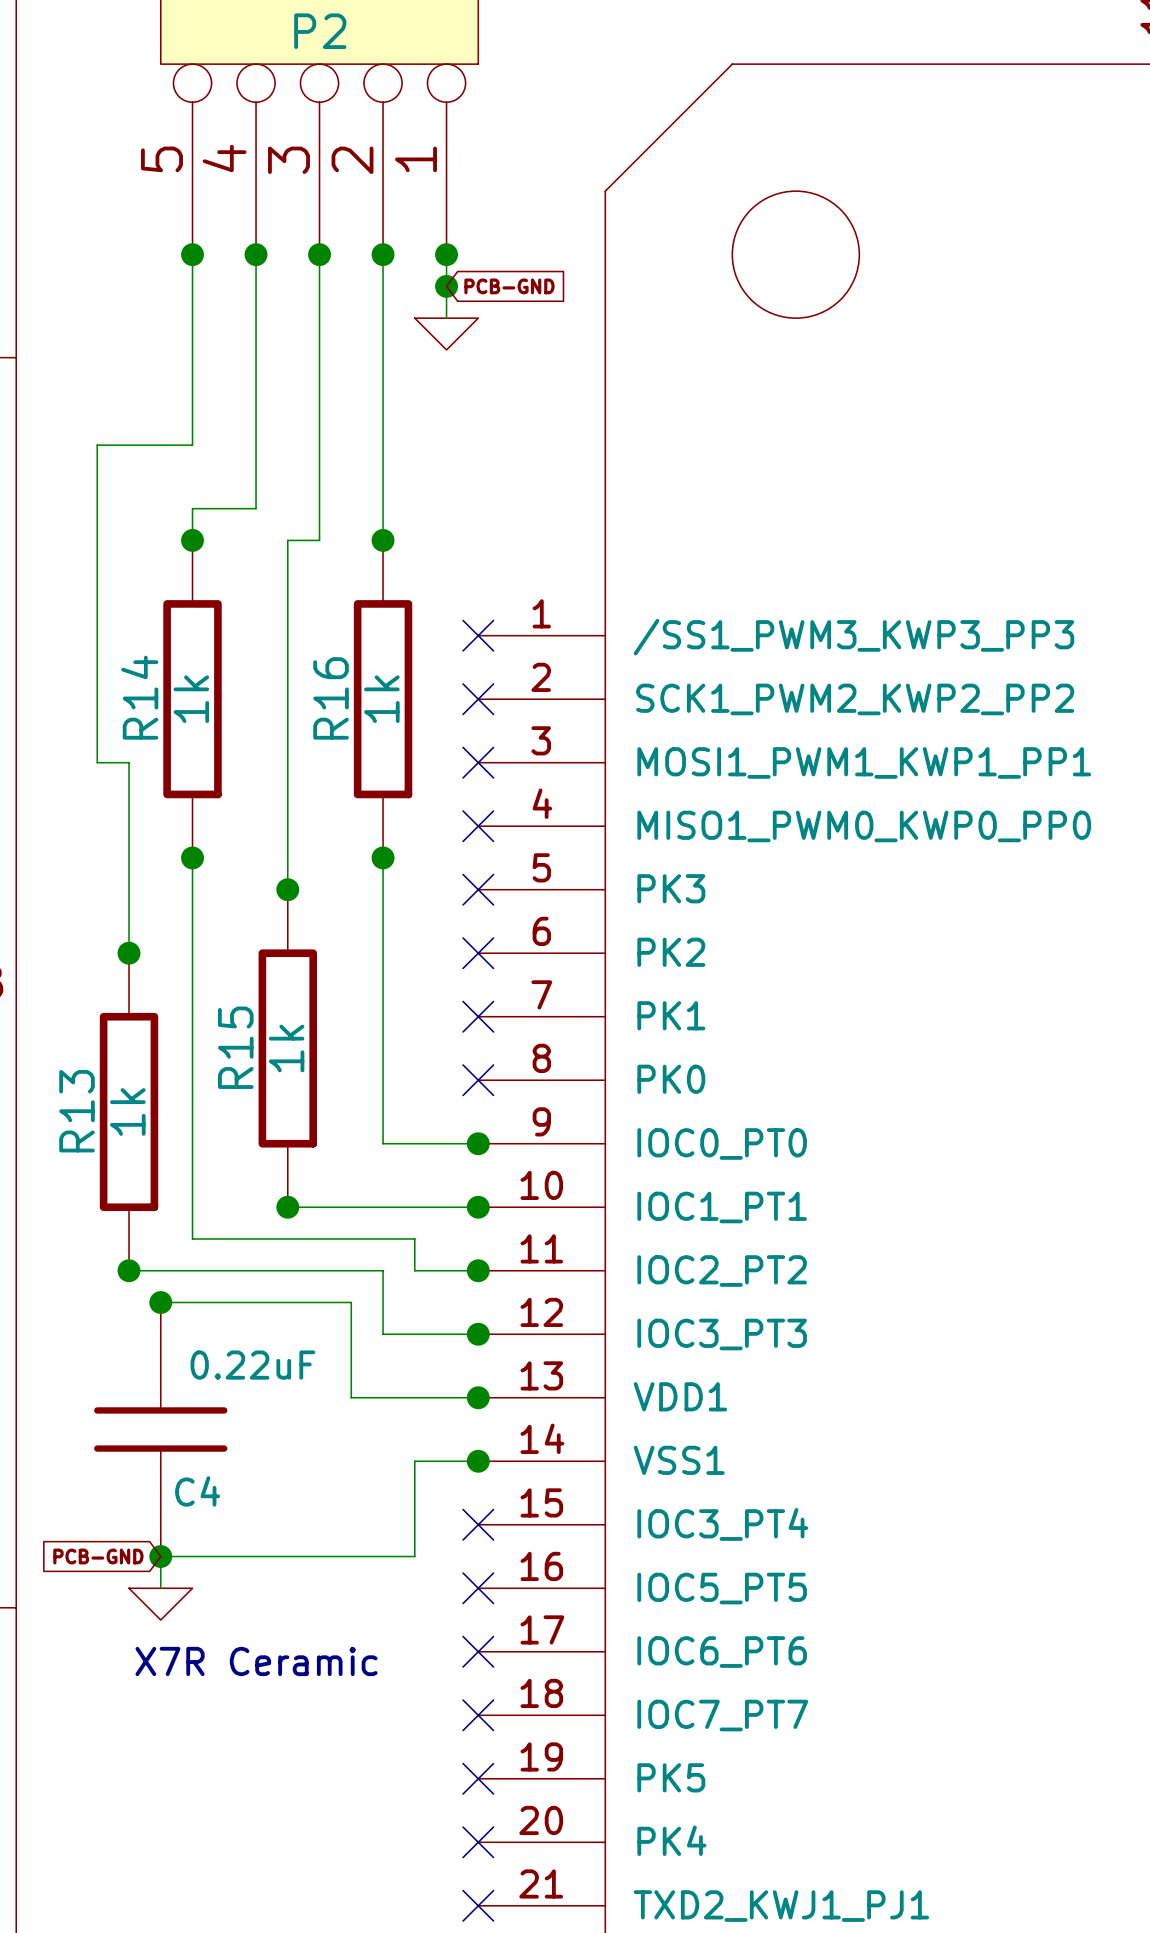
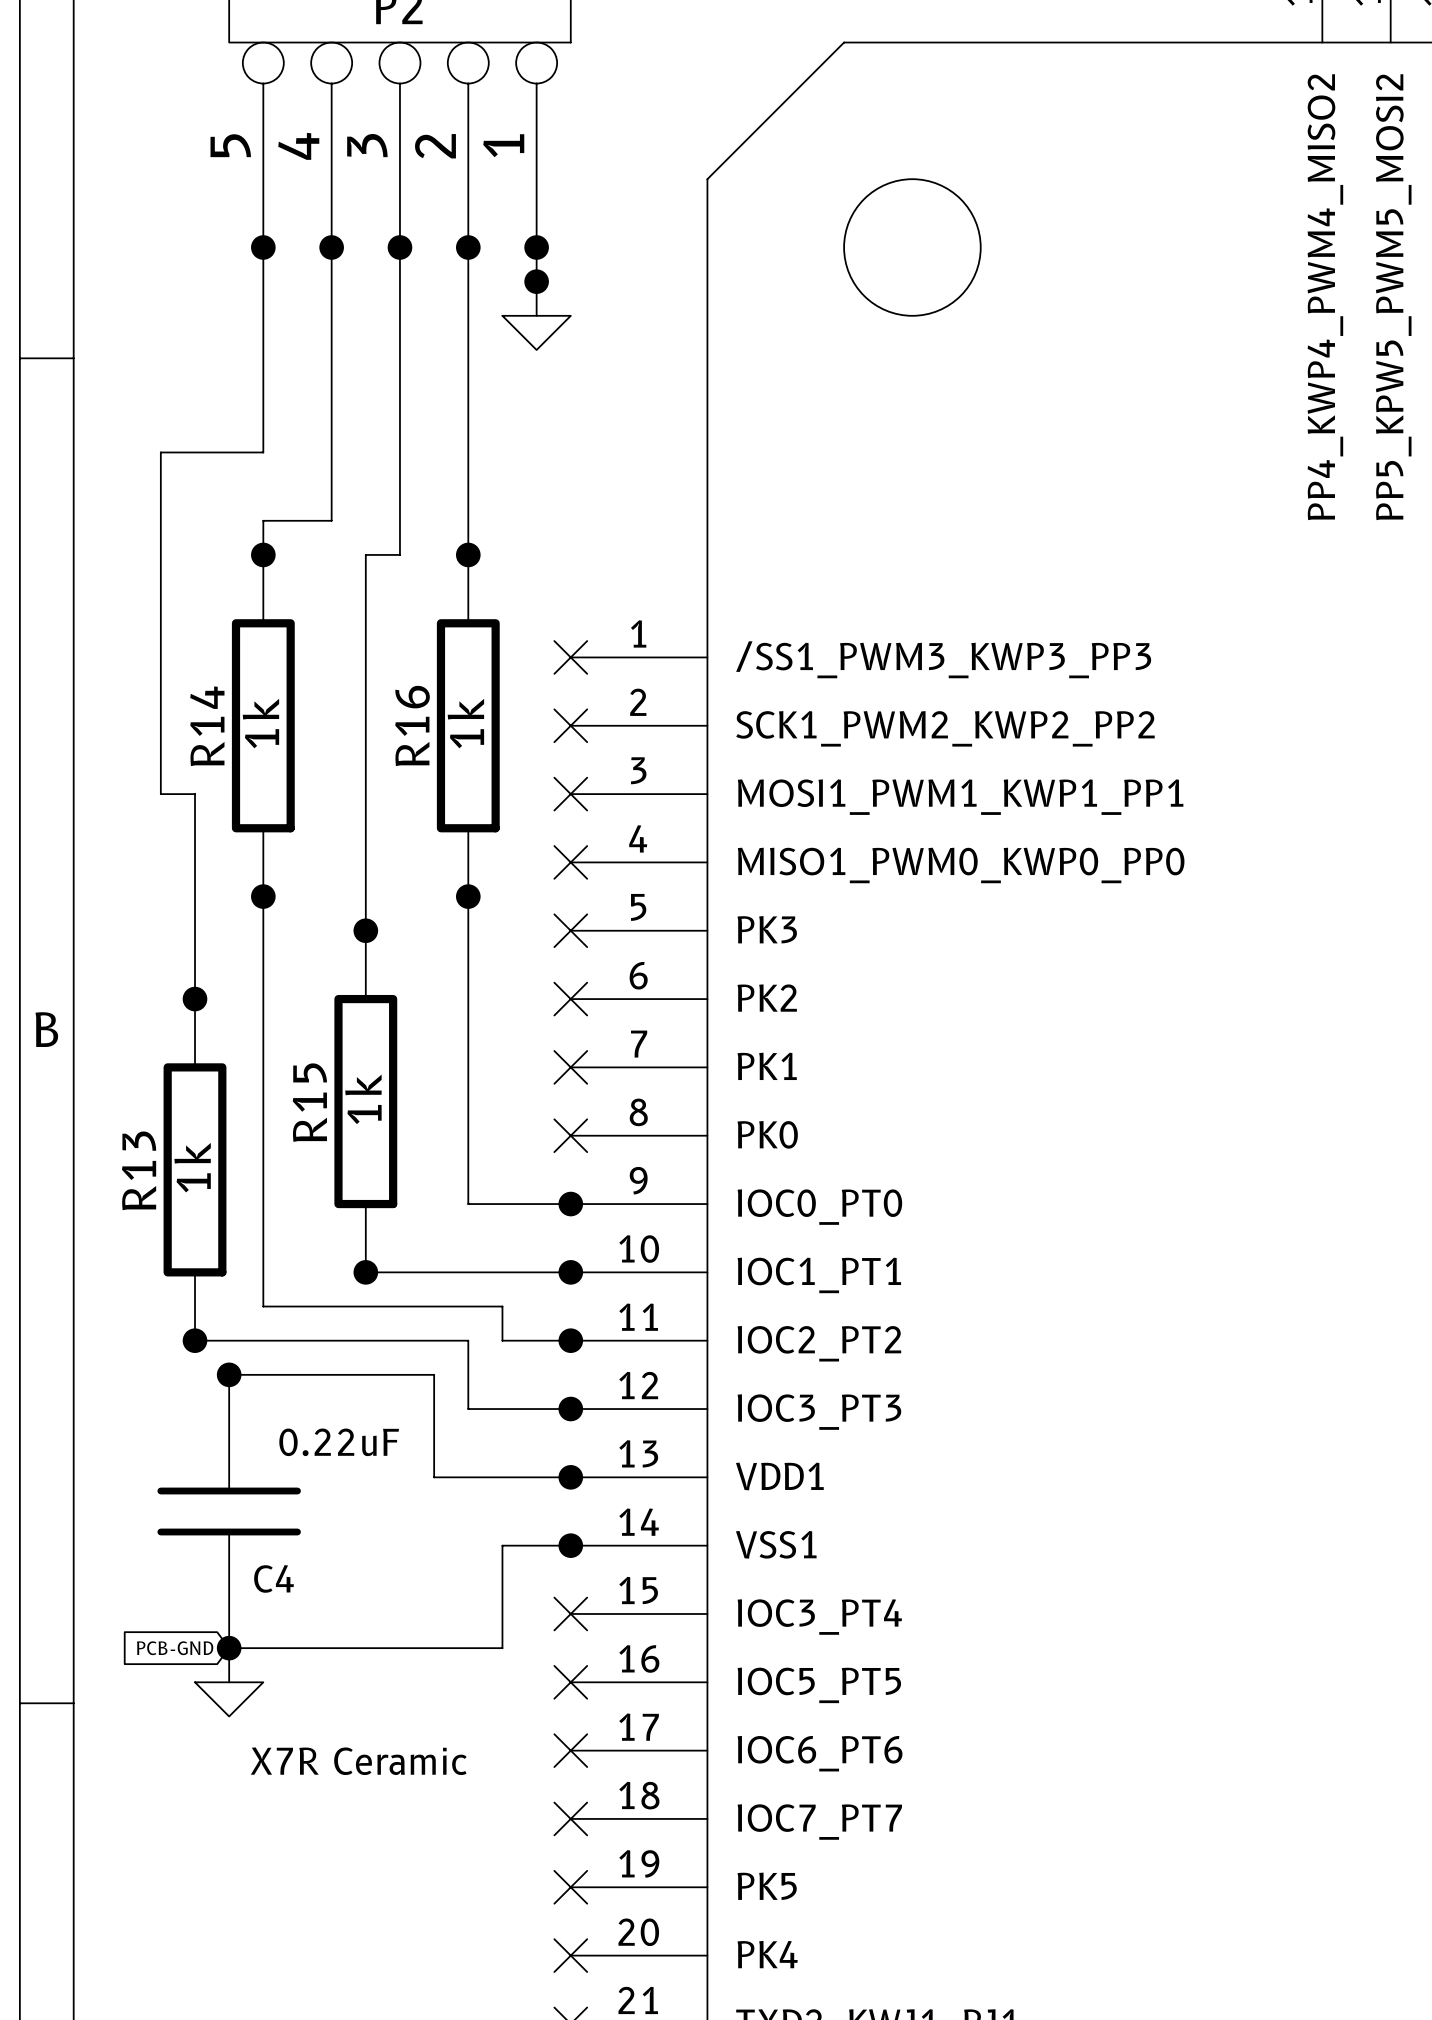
global label: PCB-GND (509, 286) -> none

